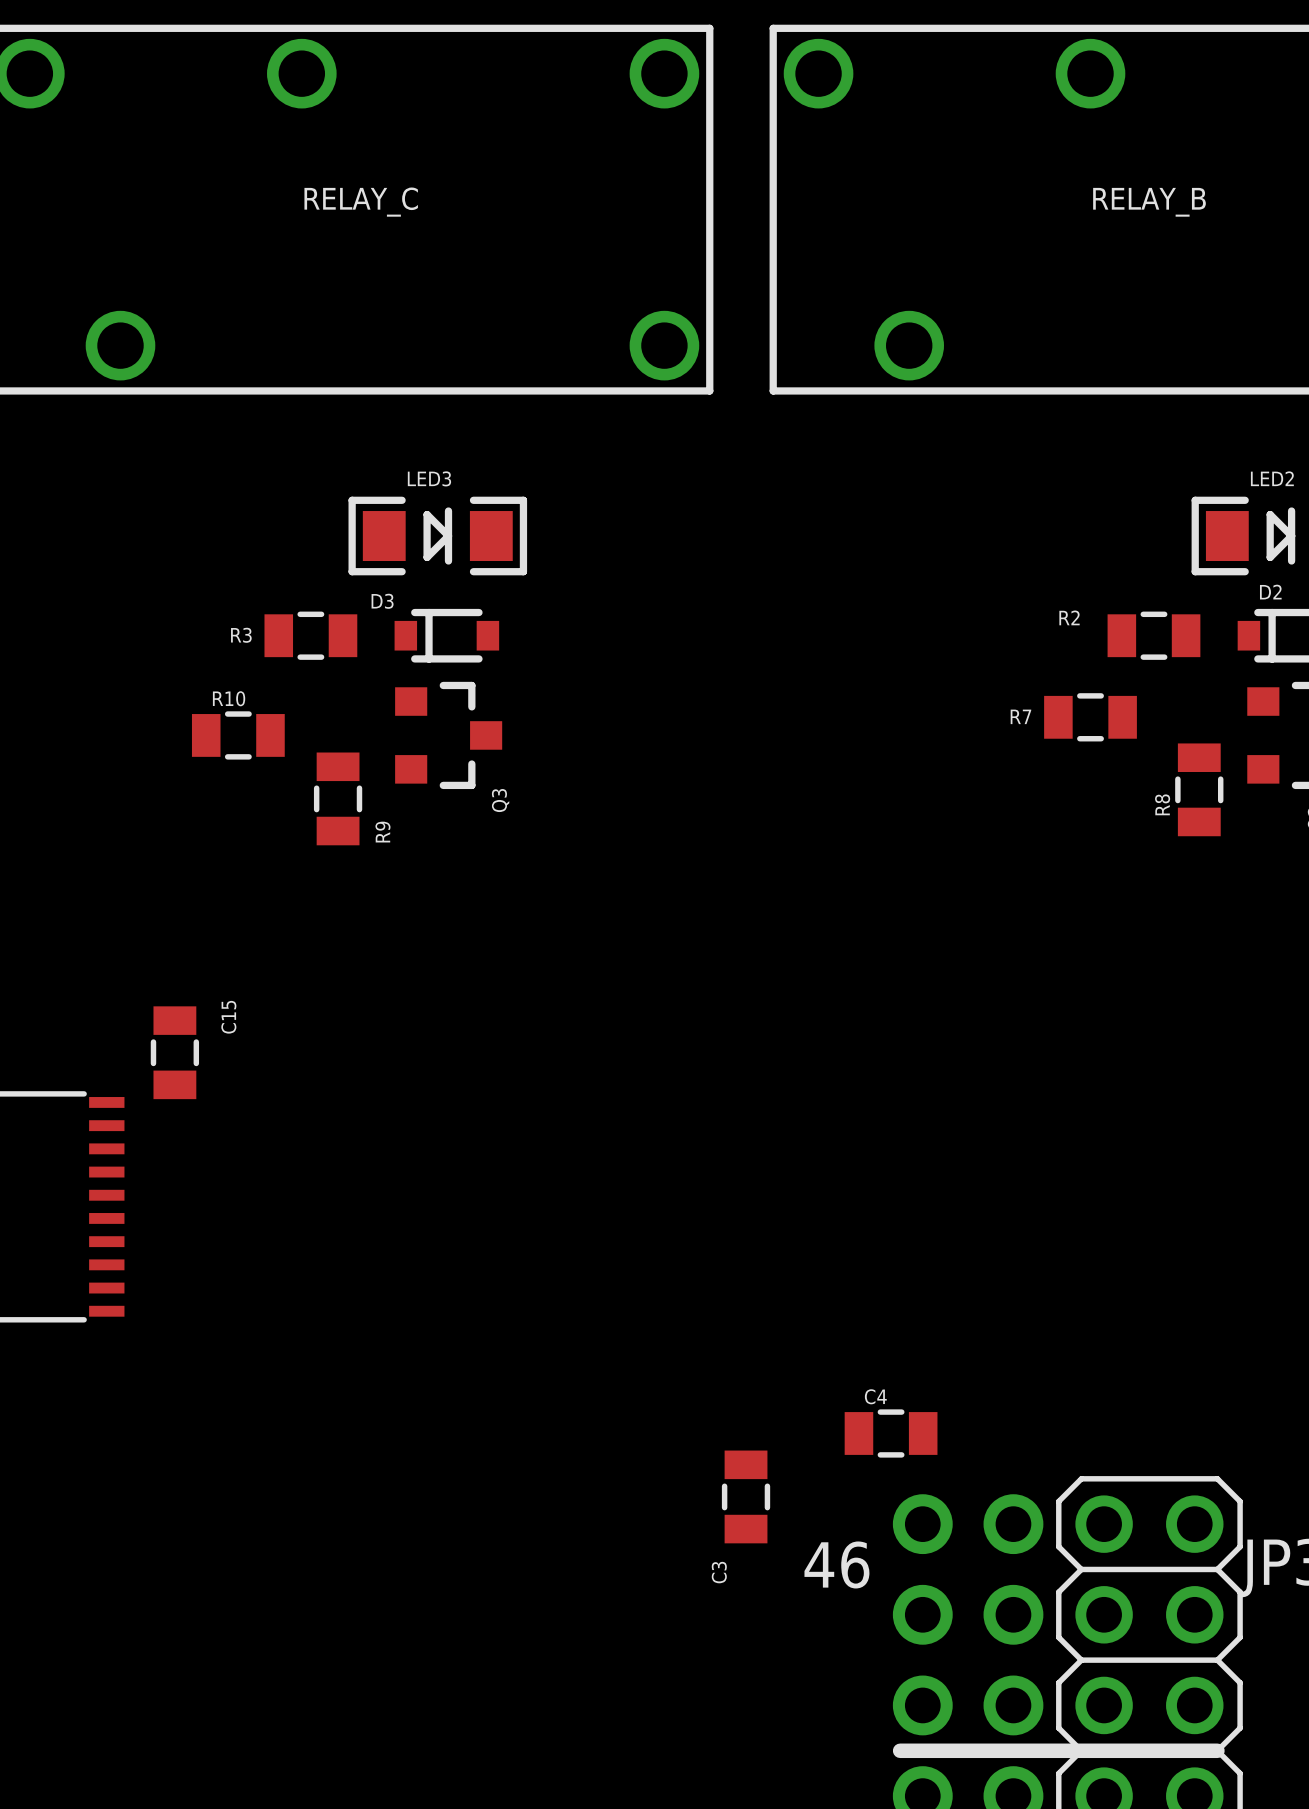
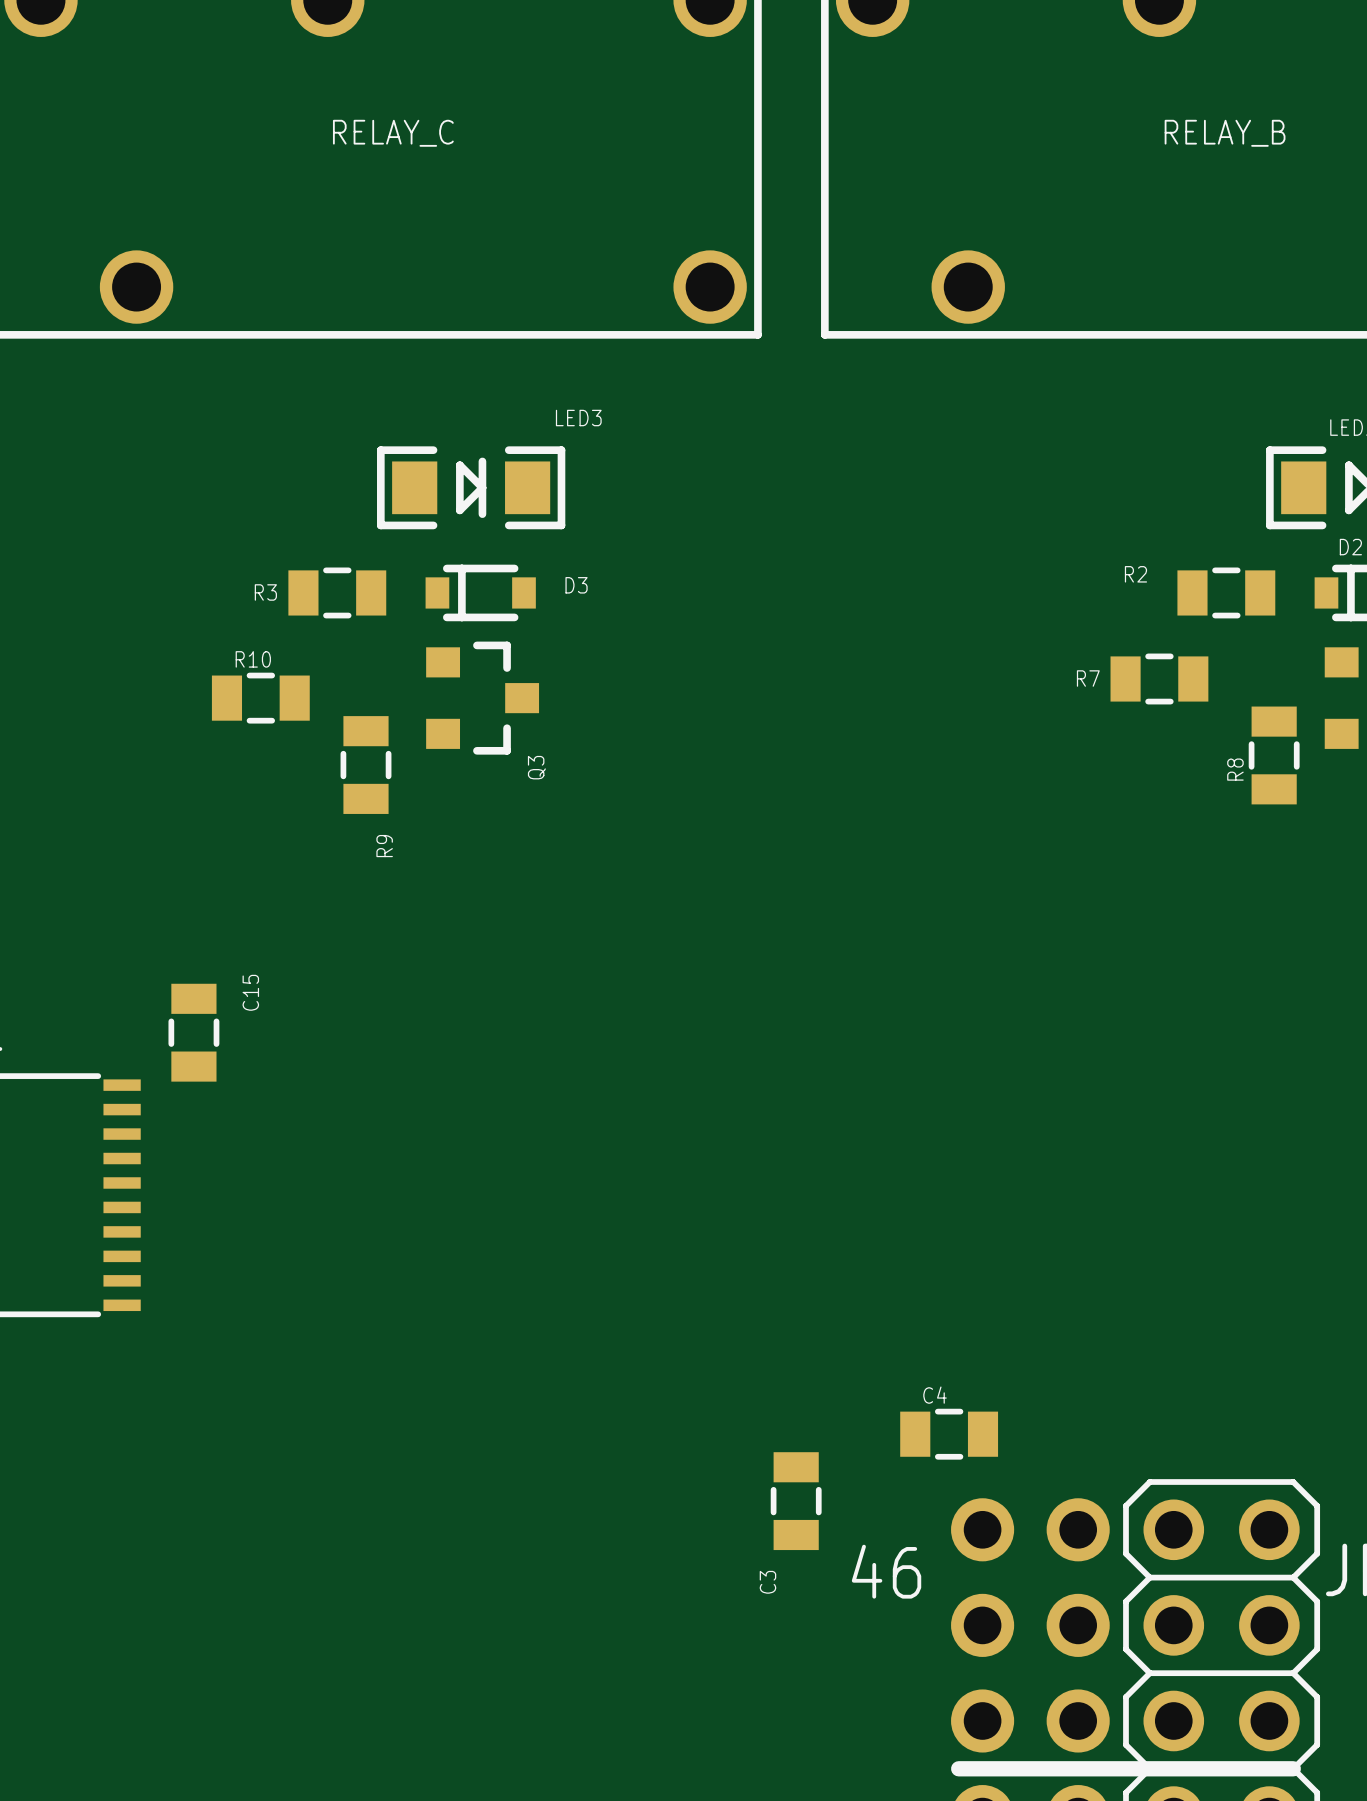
LED3 name position: LED3 (429, 478) -> LED3 (578, 418)
D3 name position: D3 (382, 601) -> D3 (576, 585)
R9 name position: R9 (382, 832) -> R9 (384, 846)

